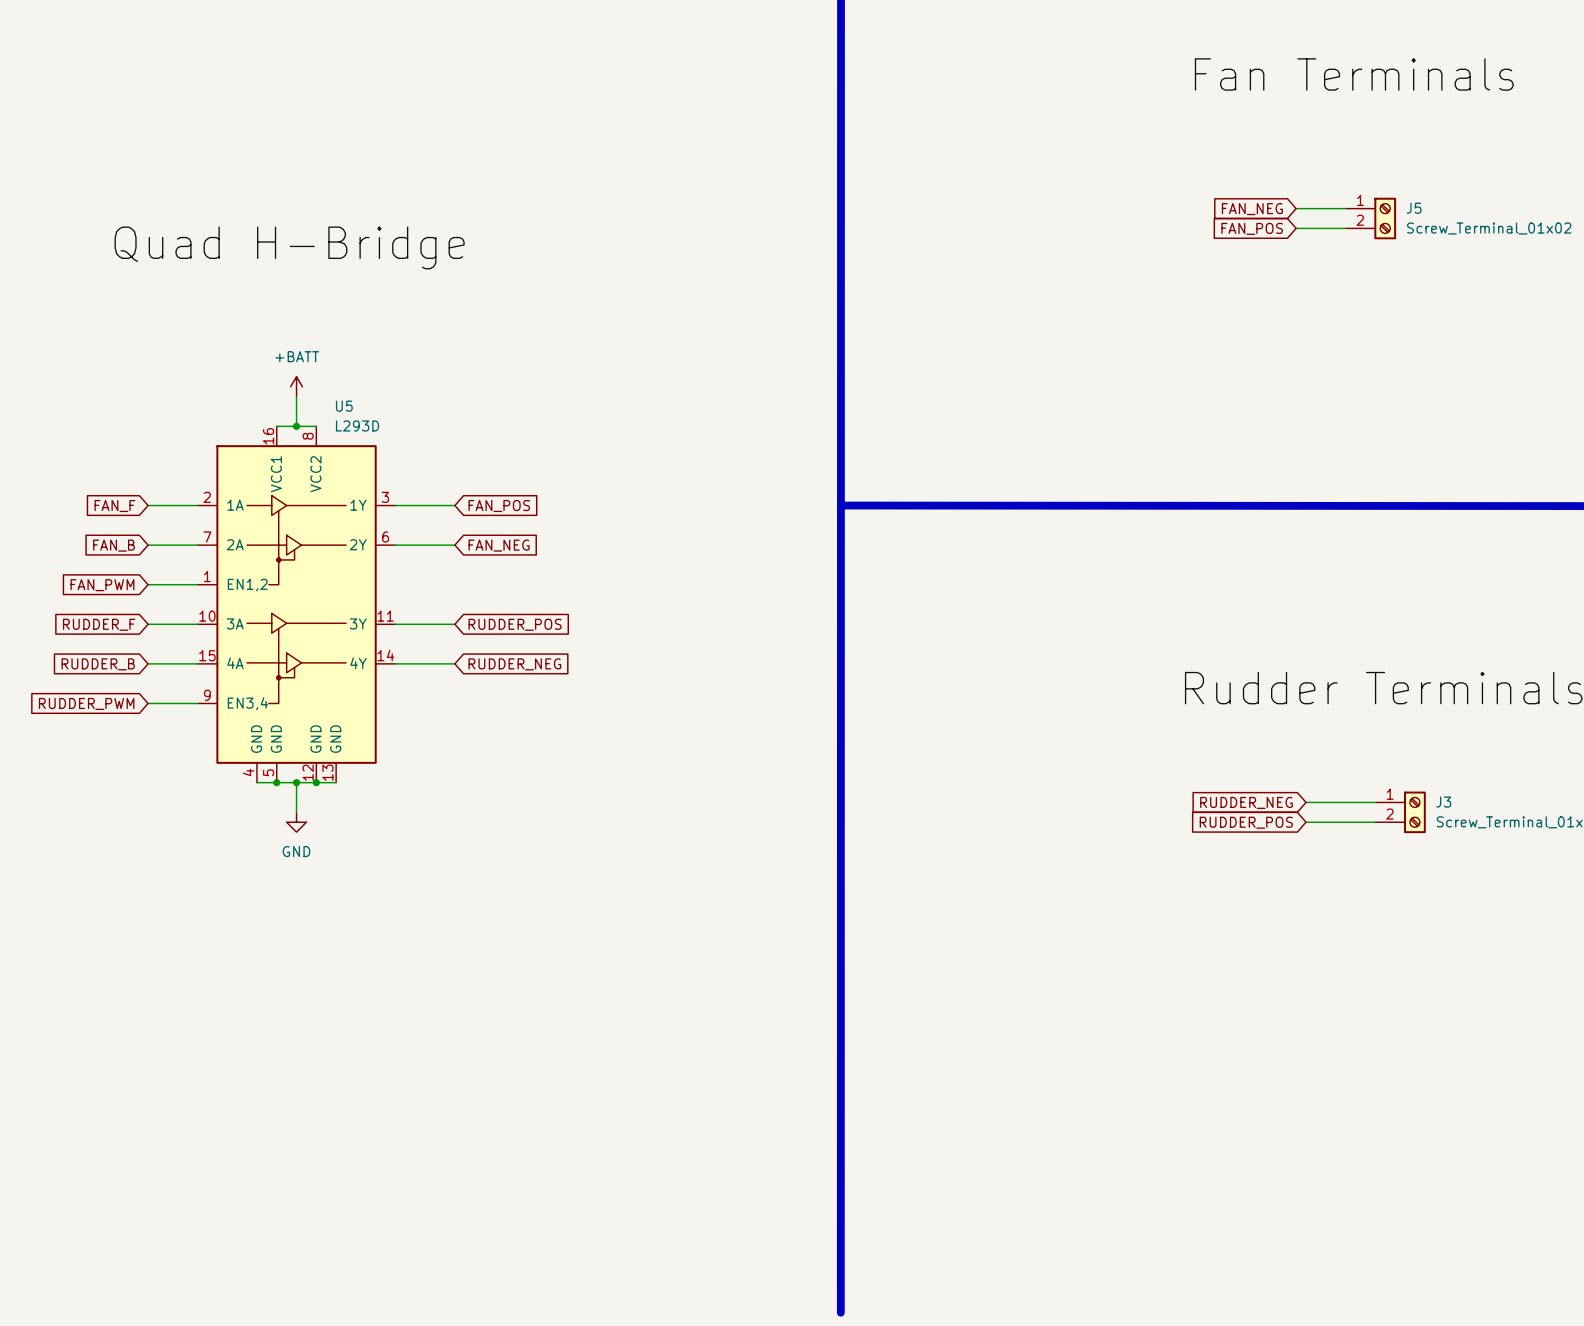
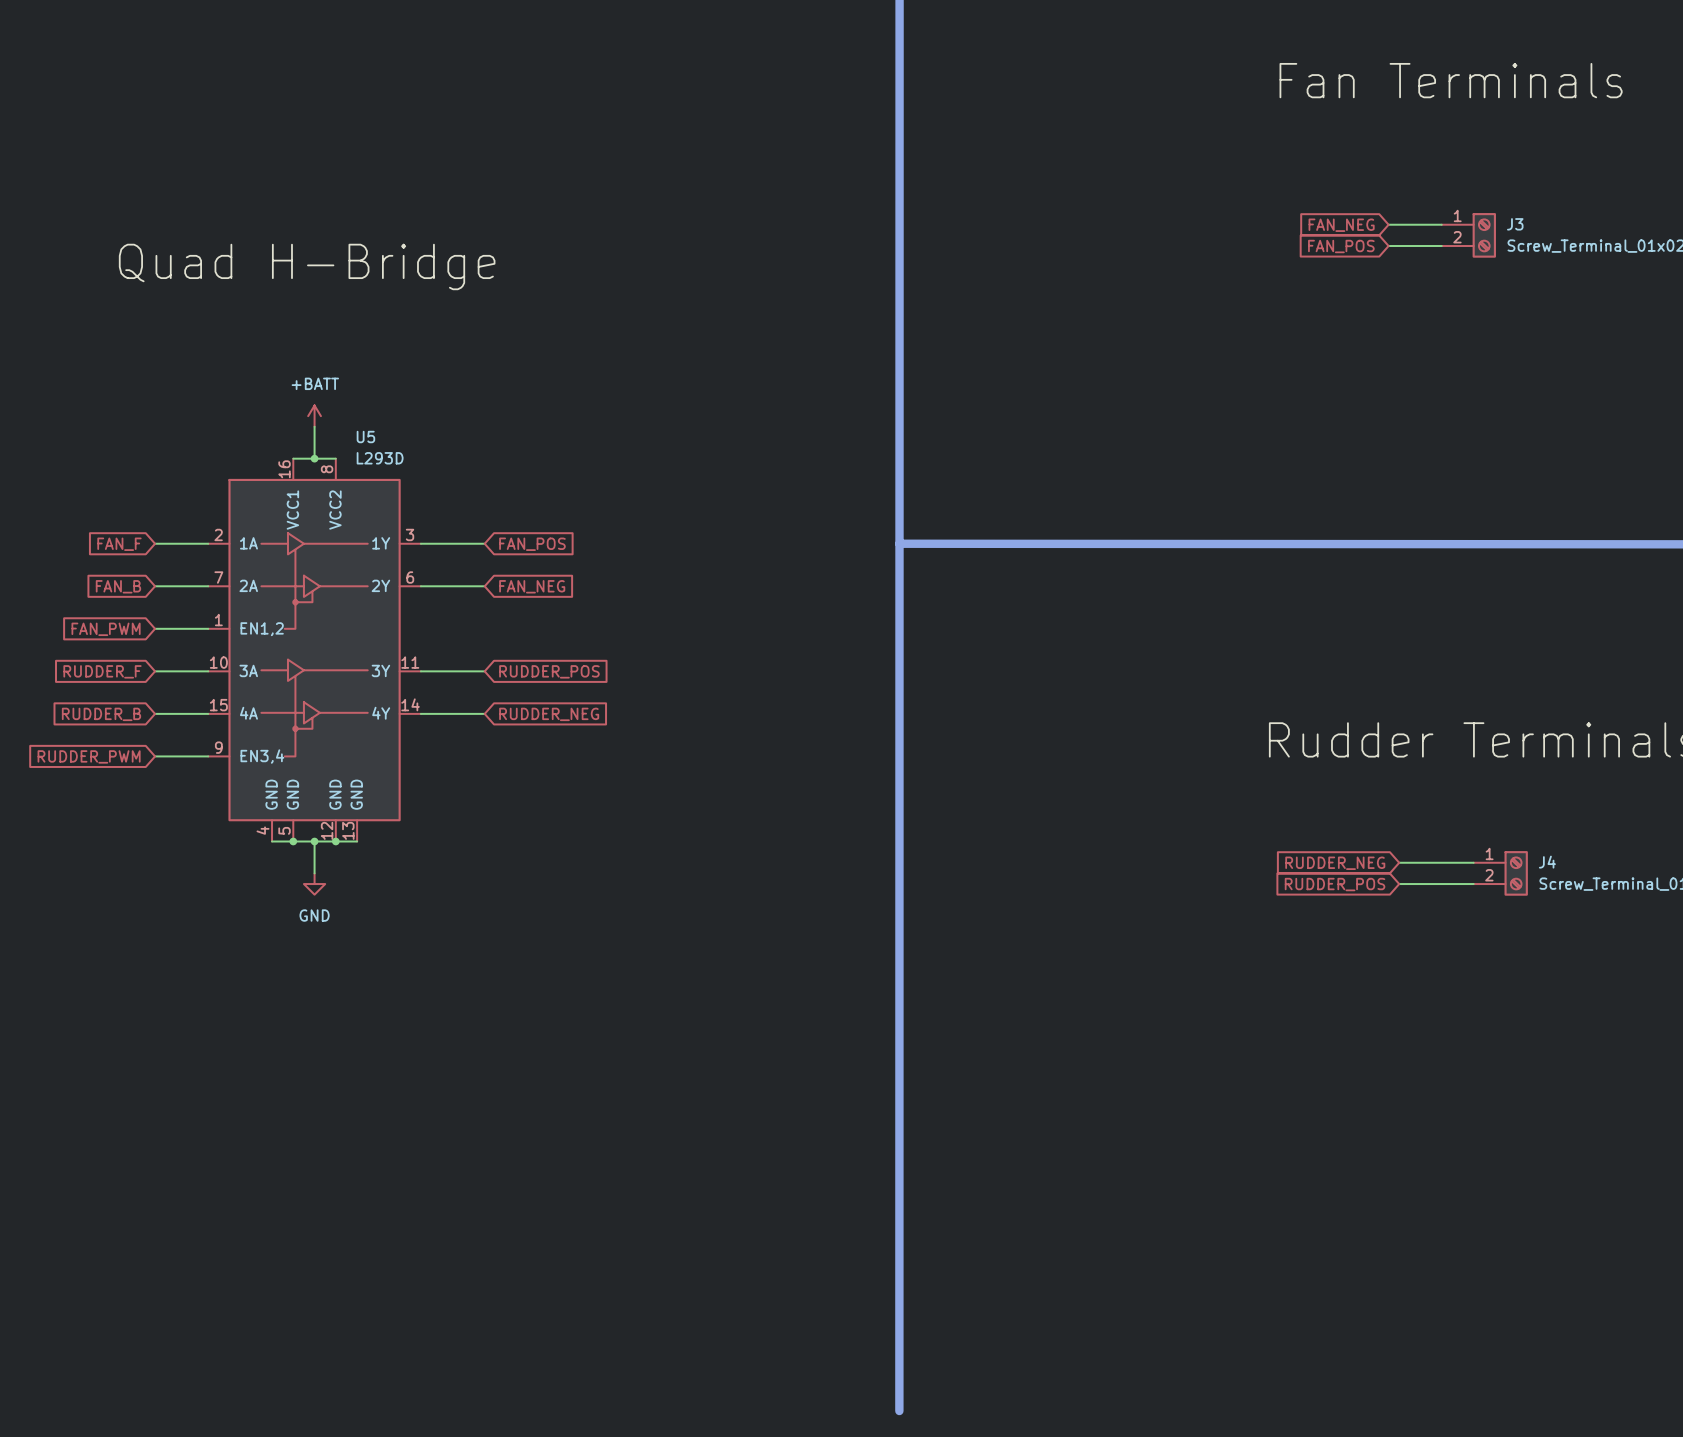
J5 name: J5 (1414, 208) -> J3 (1515, 224)
J3 name: J3 (1443, 802) -> J4 (1547, 862)

